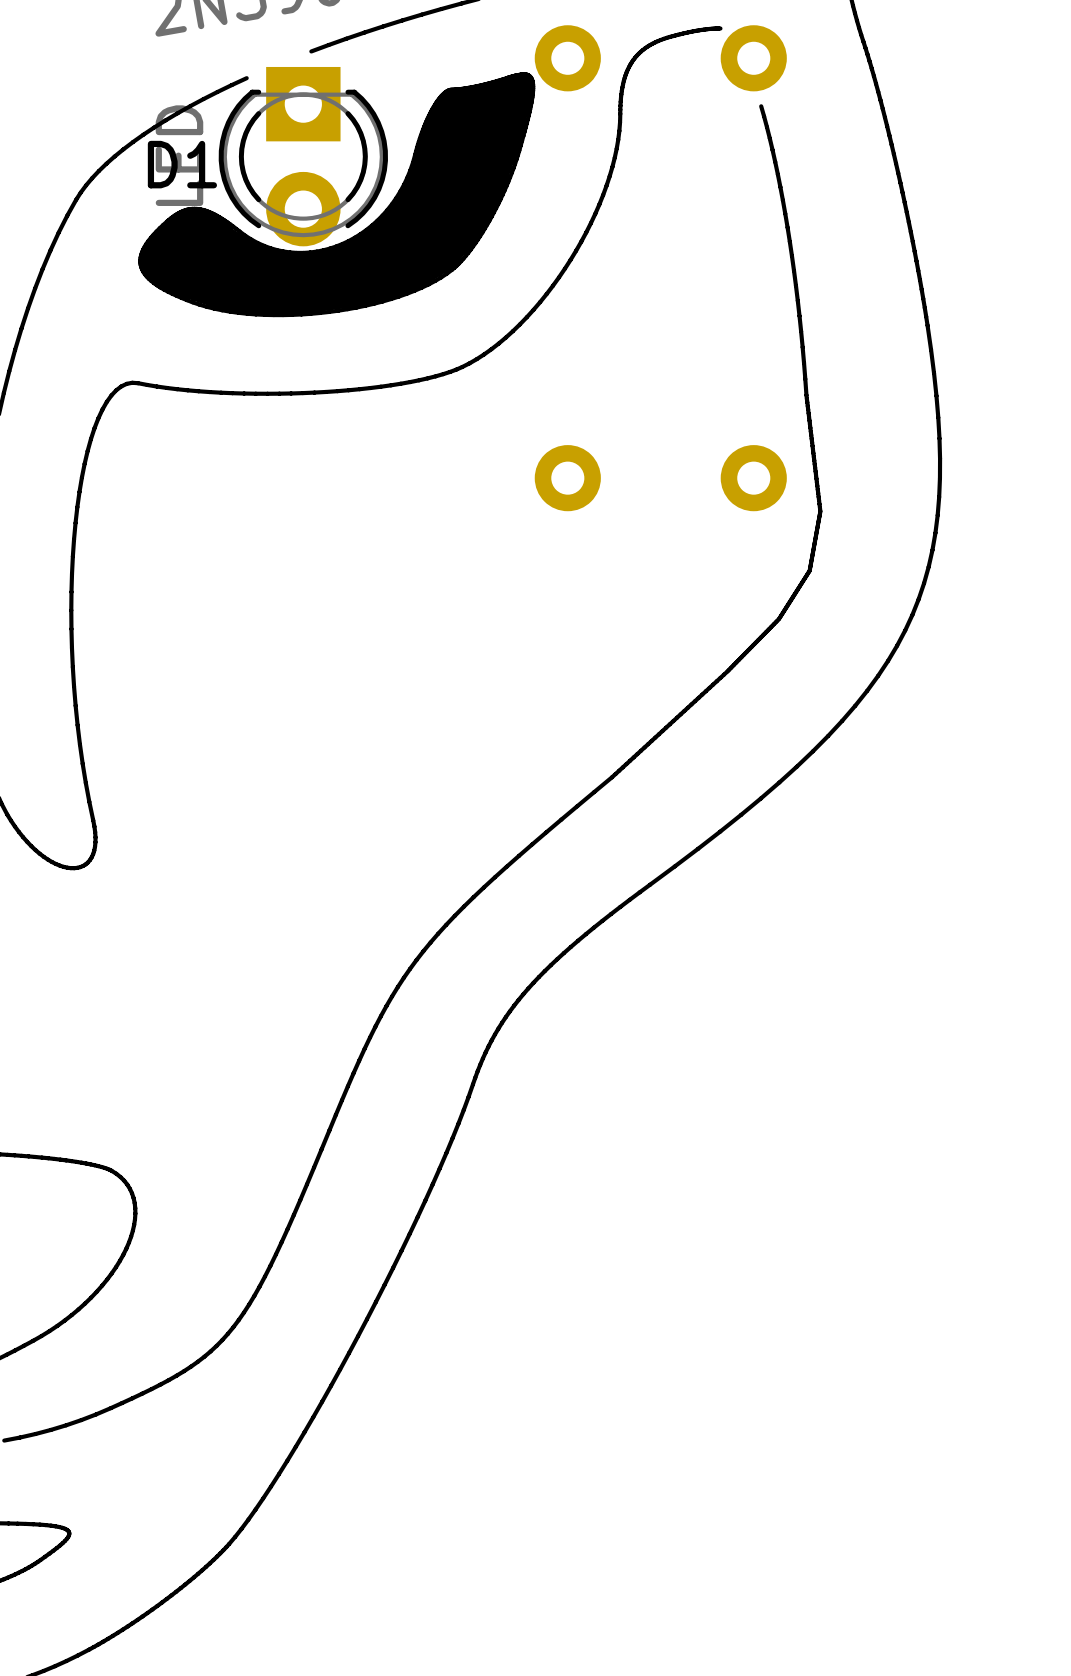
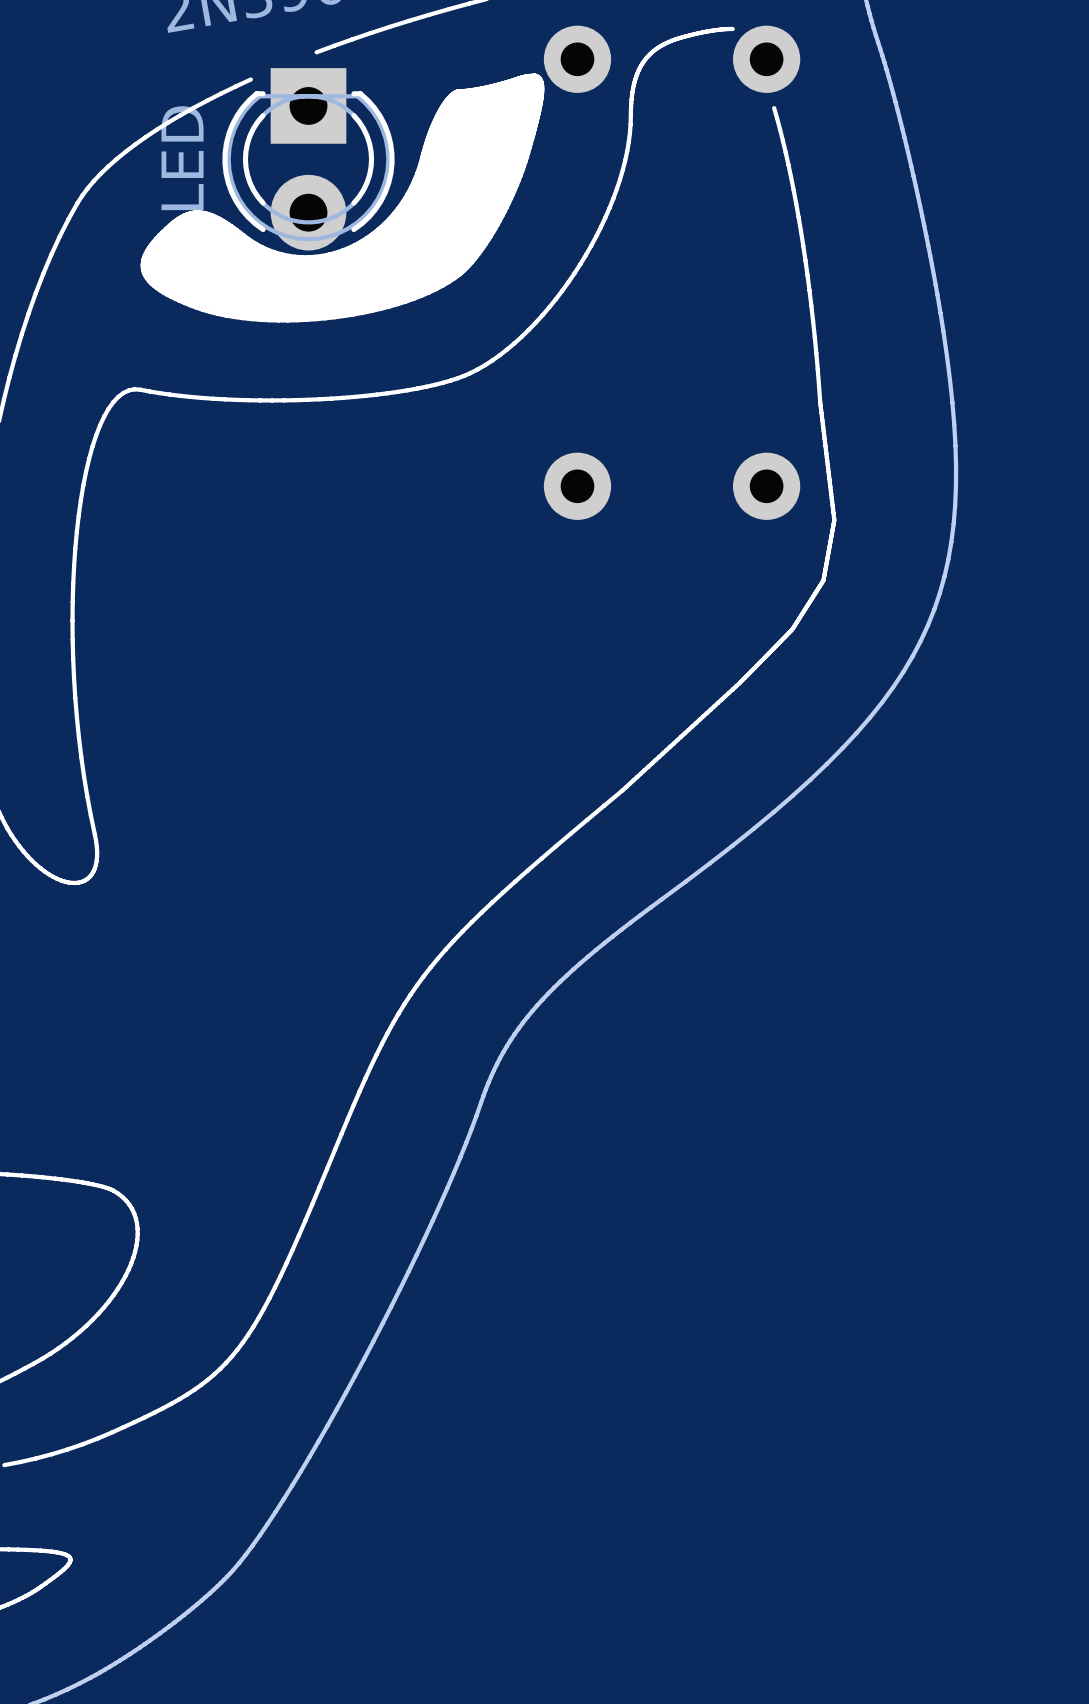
D1 name: D1 (182, 164) -> none

